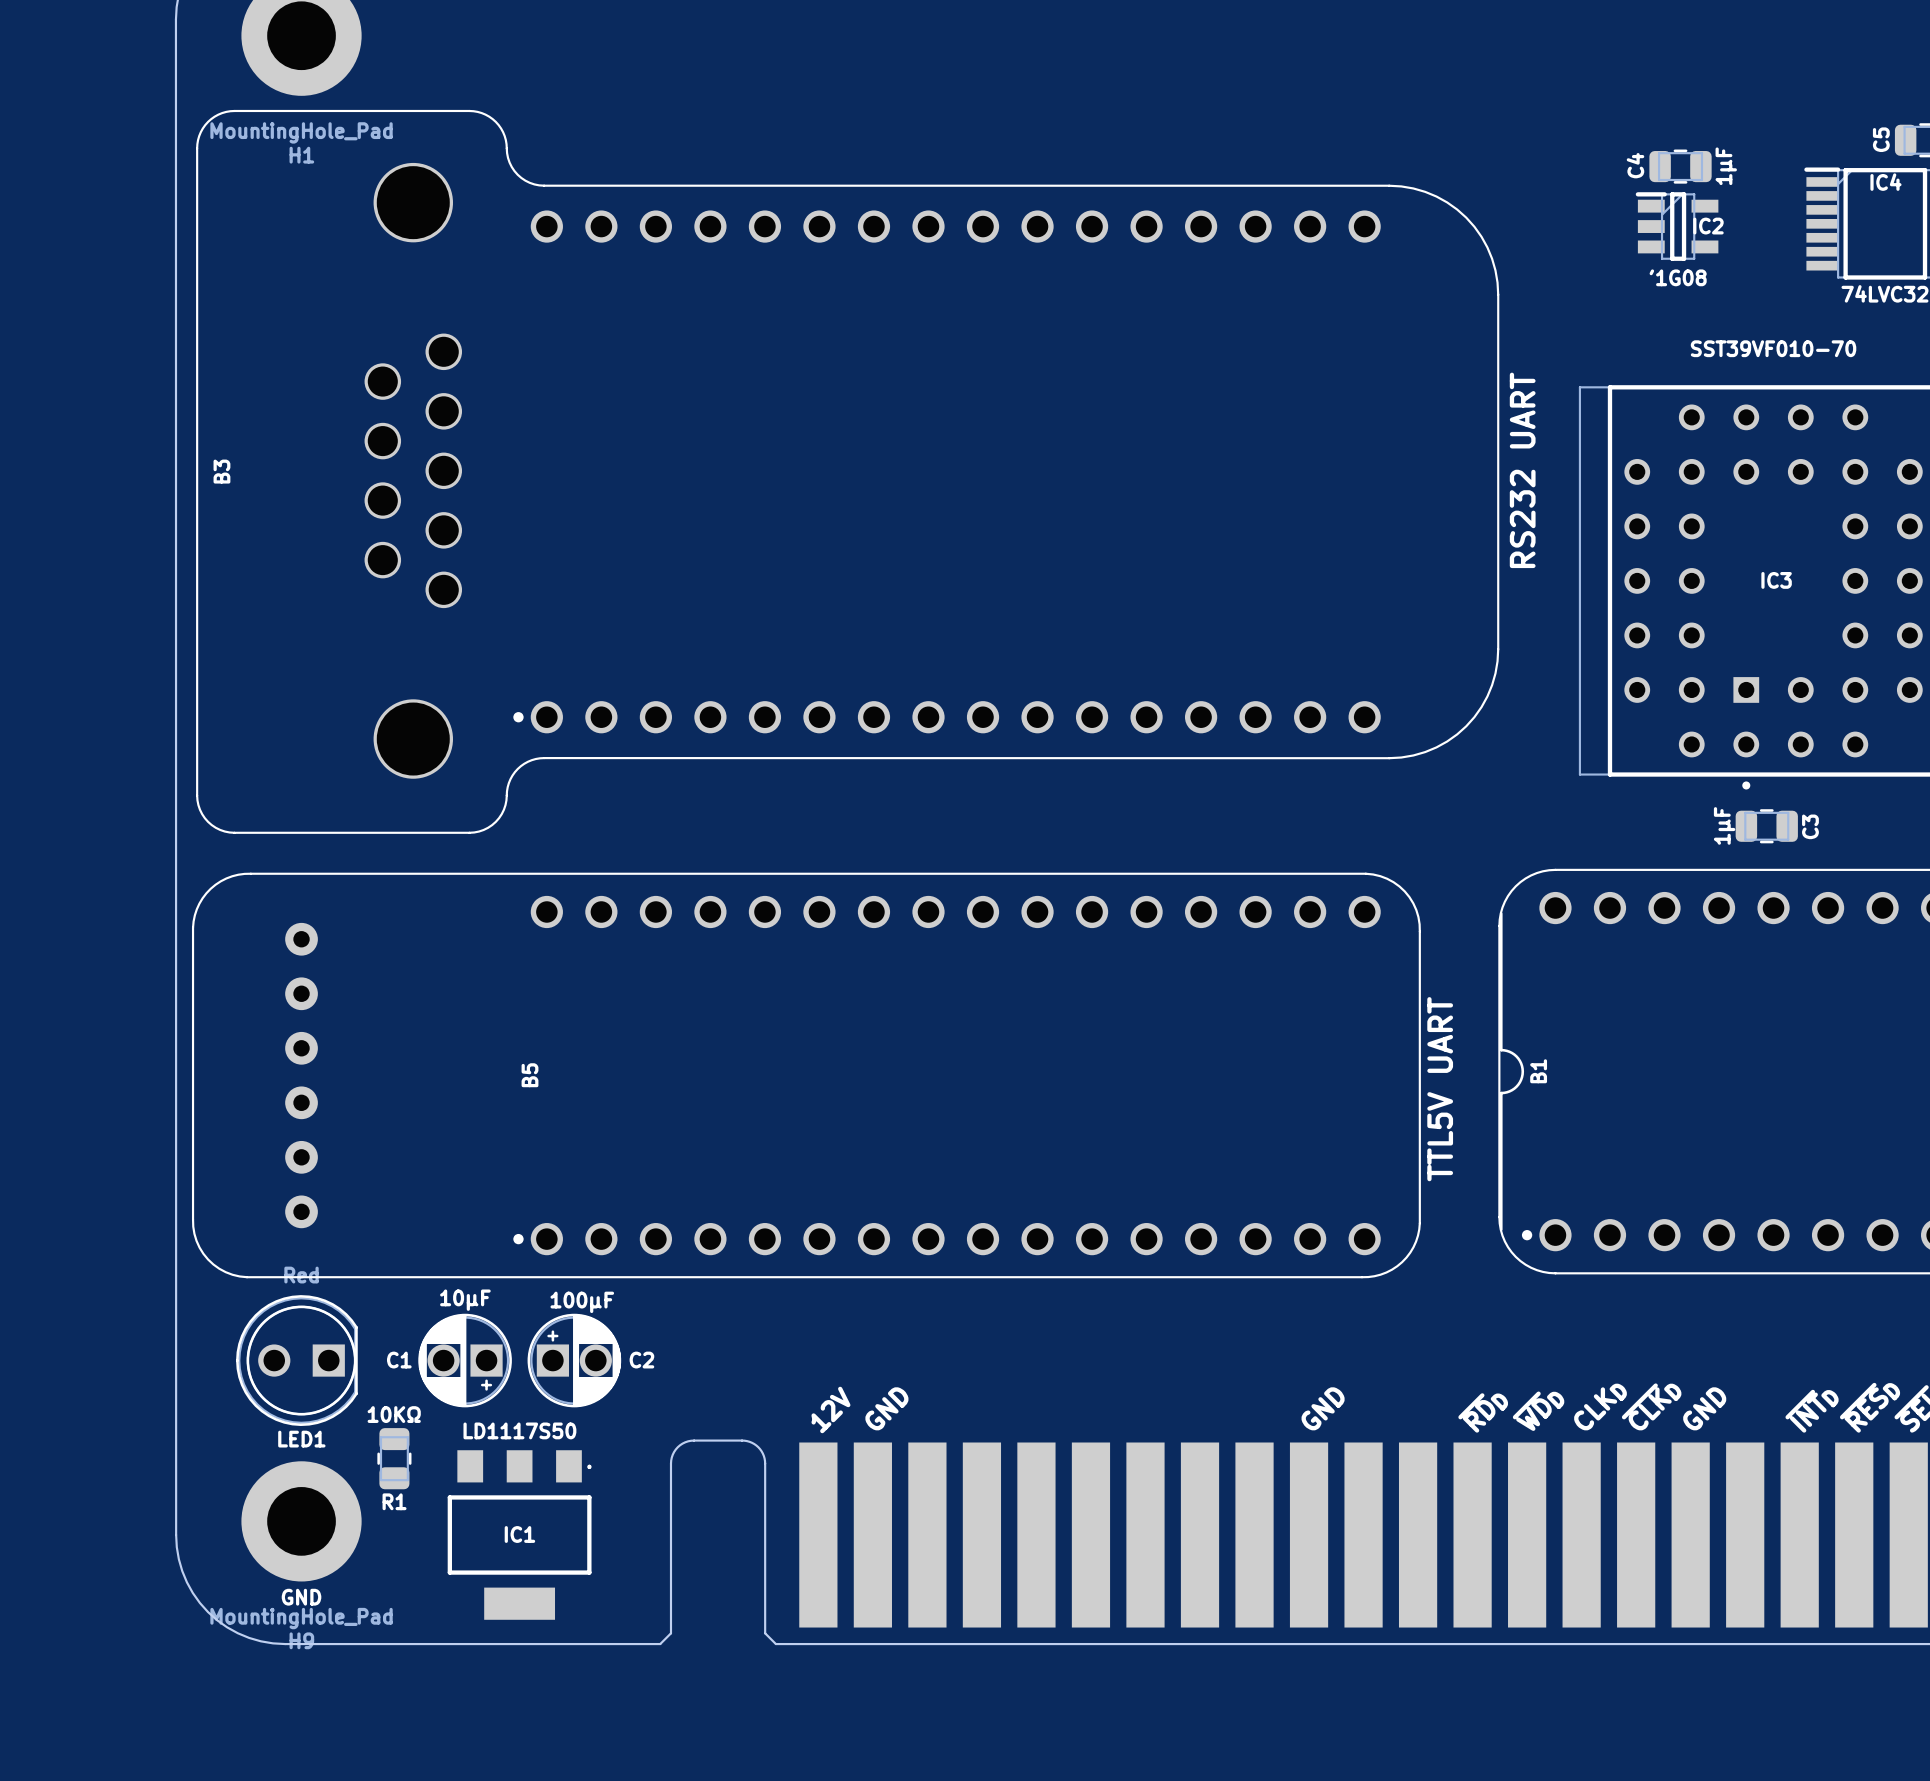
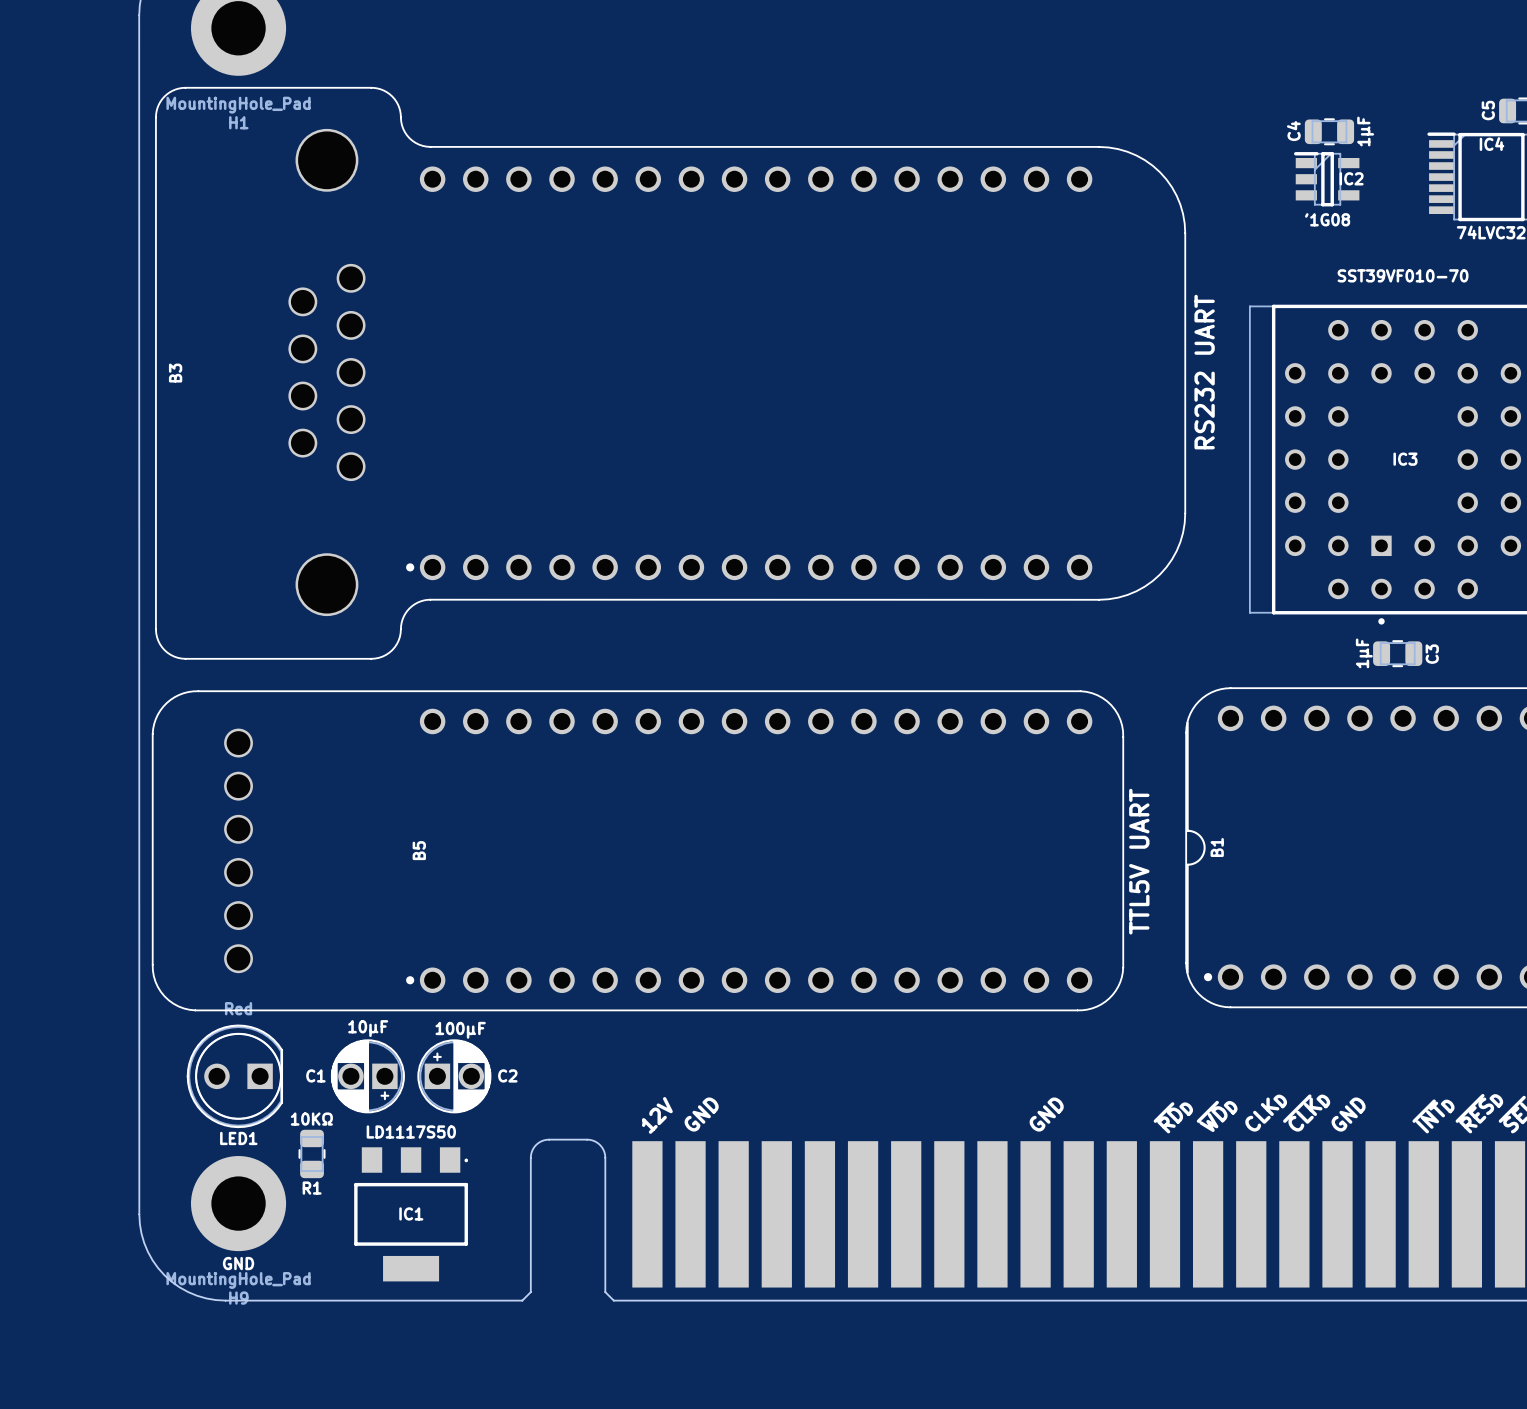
B5 footprint: [191, 872, 1421, 1279] -> [151, 690, 1125, 1012]

